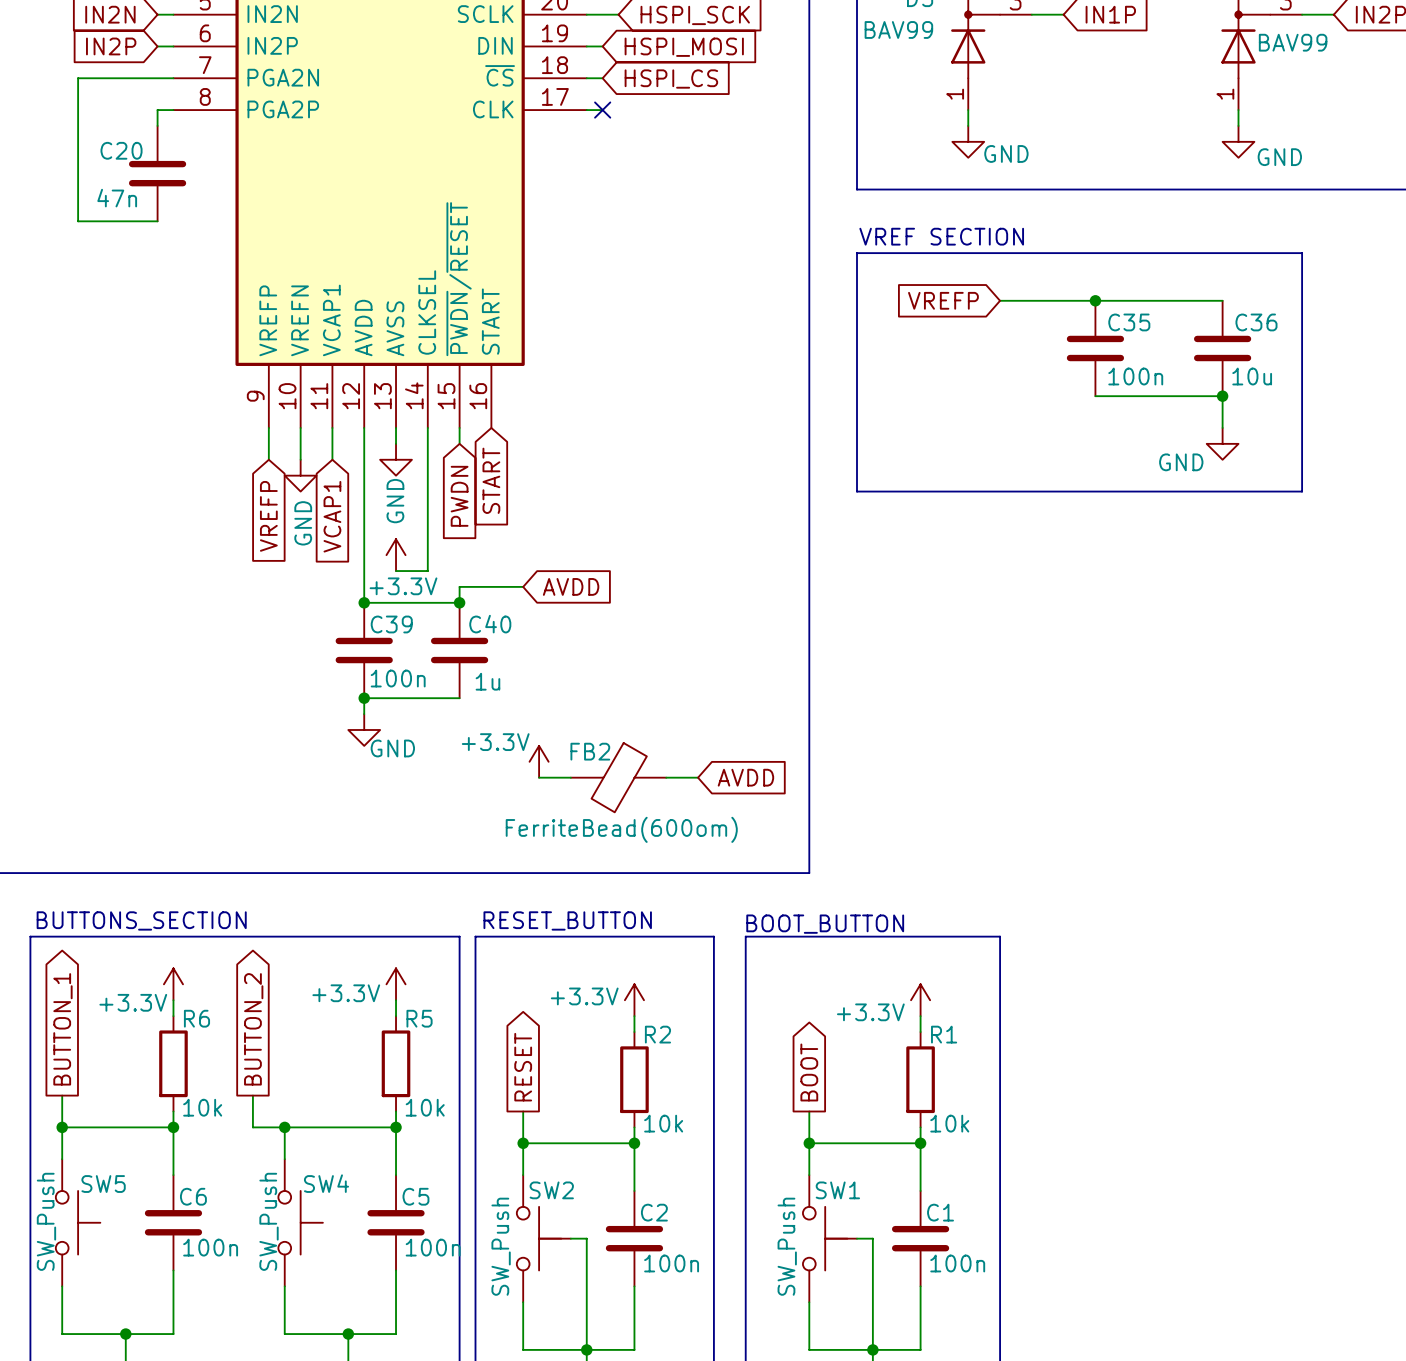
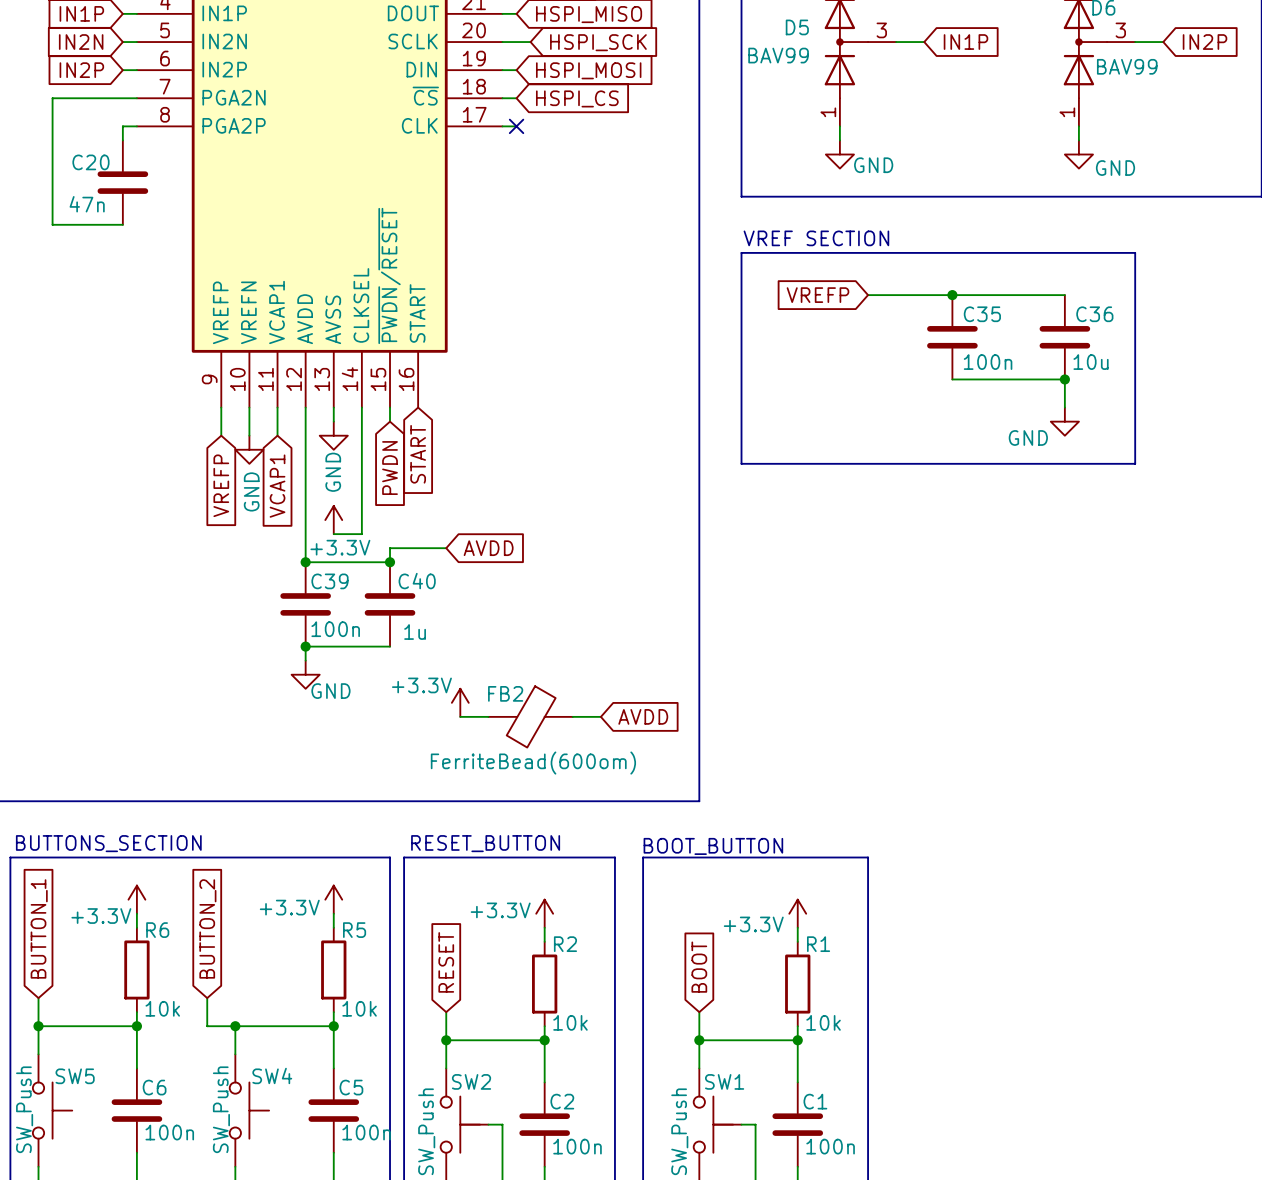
global label shape: output (62, 1029) -> input (39, 928)
global label shape: output (253, 1029) -> input (207, 928)
global label shape: output (523, 1067) -> input (446, 962)
global label shape: output (809, 1072) -> input (699, 967)

